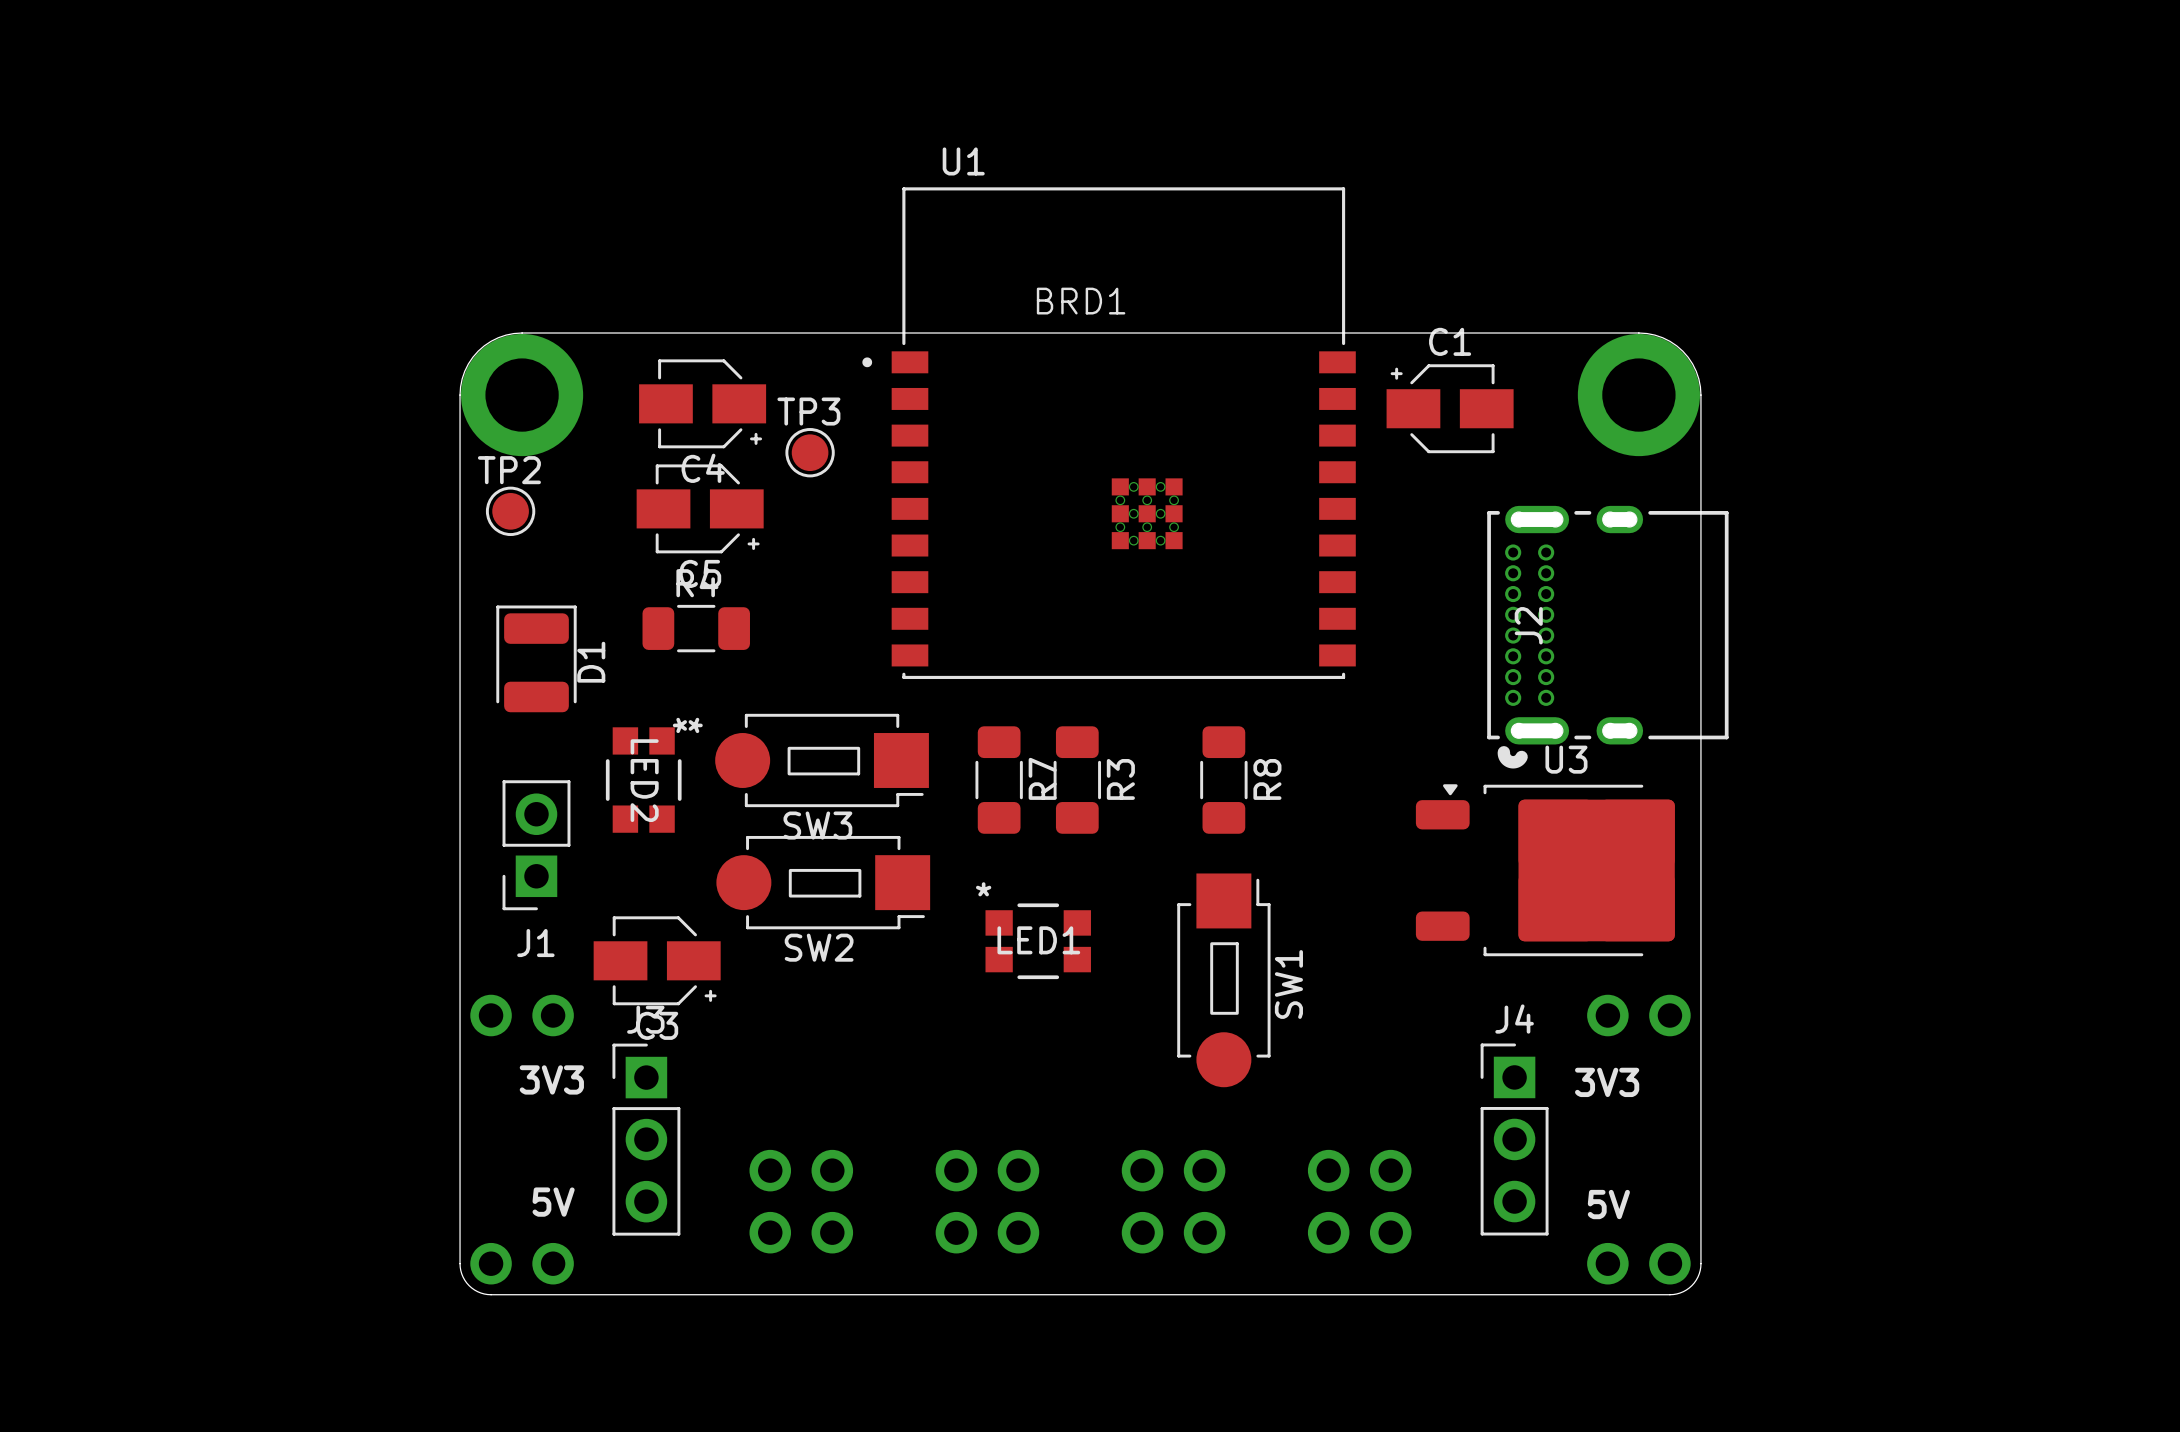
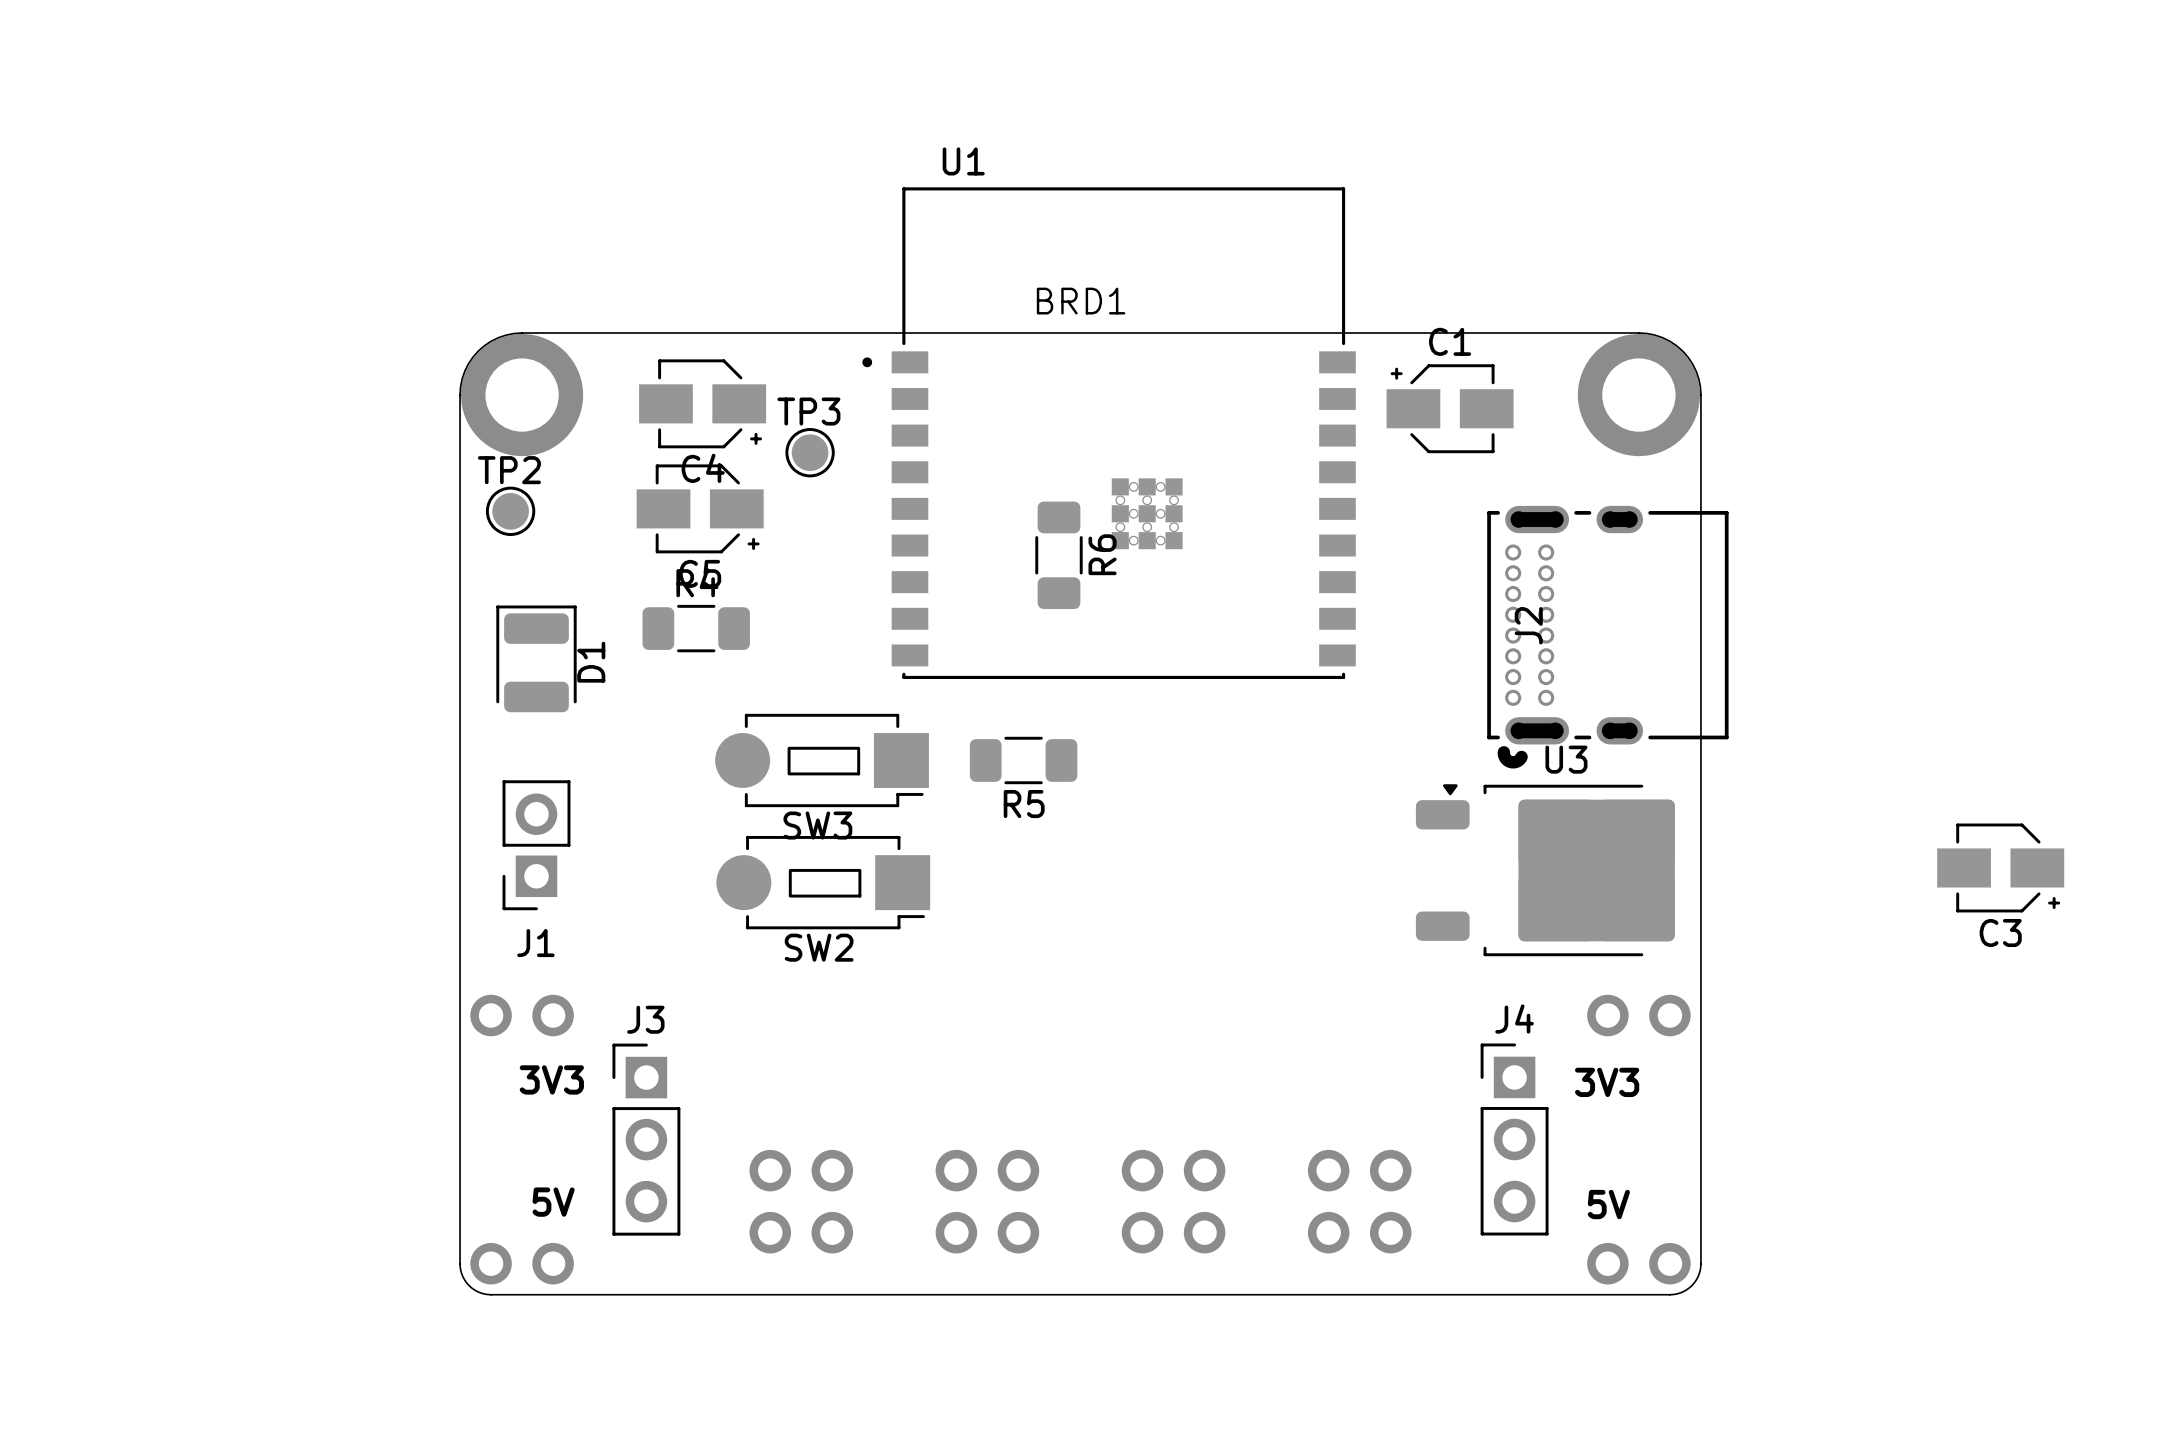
R6: none -> (1059, 555)
R5: none -> (1023, 760)
LED2: (643, 780) -> none
R7: (999, 780) -> none
R3: (1077, 780) -> none
R8: (1223, 780) -> none
LED1: (1038, 941) -> none
C3 position: (657, 960) -> (2000, 867)
SW1: (1223, 980) -> none

